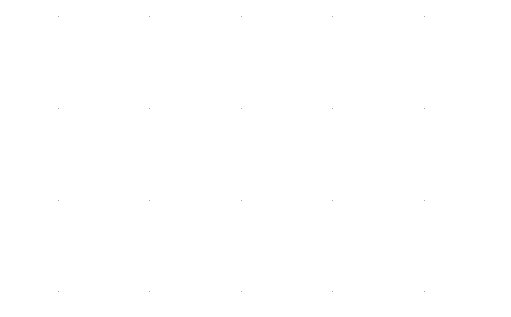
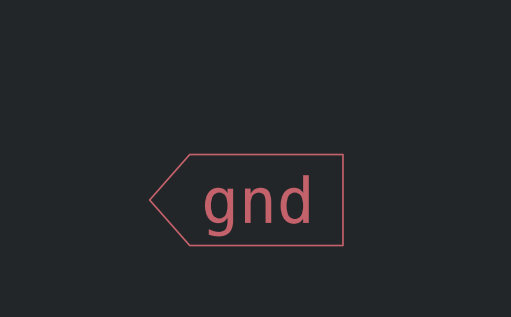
global label: none -> gnd (256, 205)

